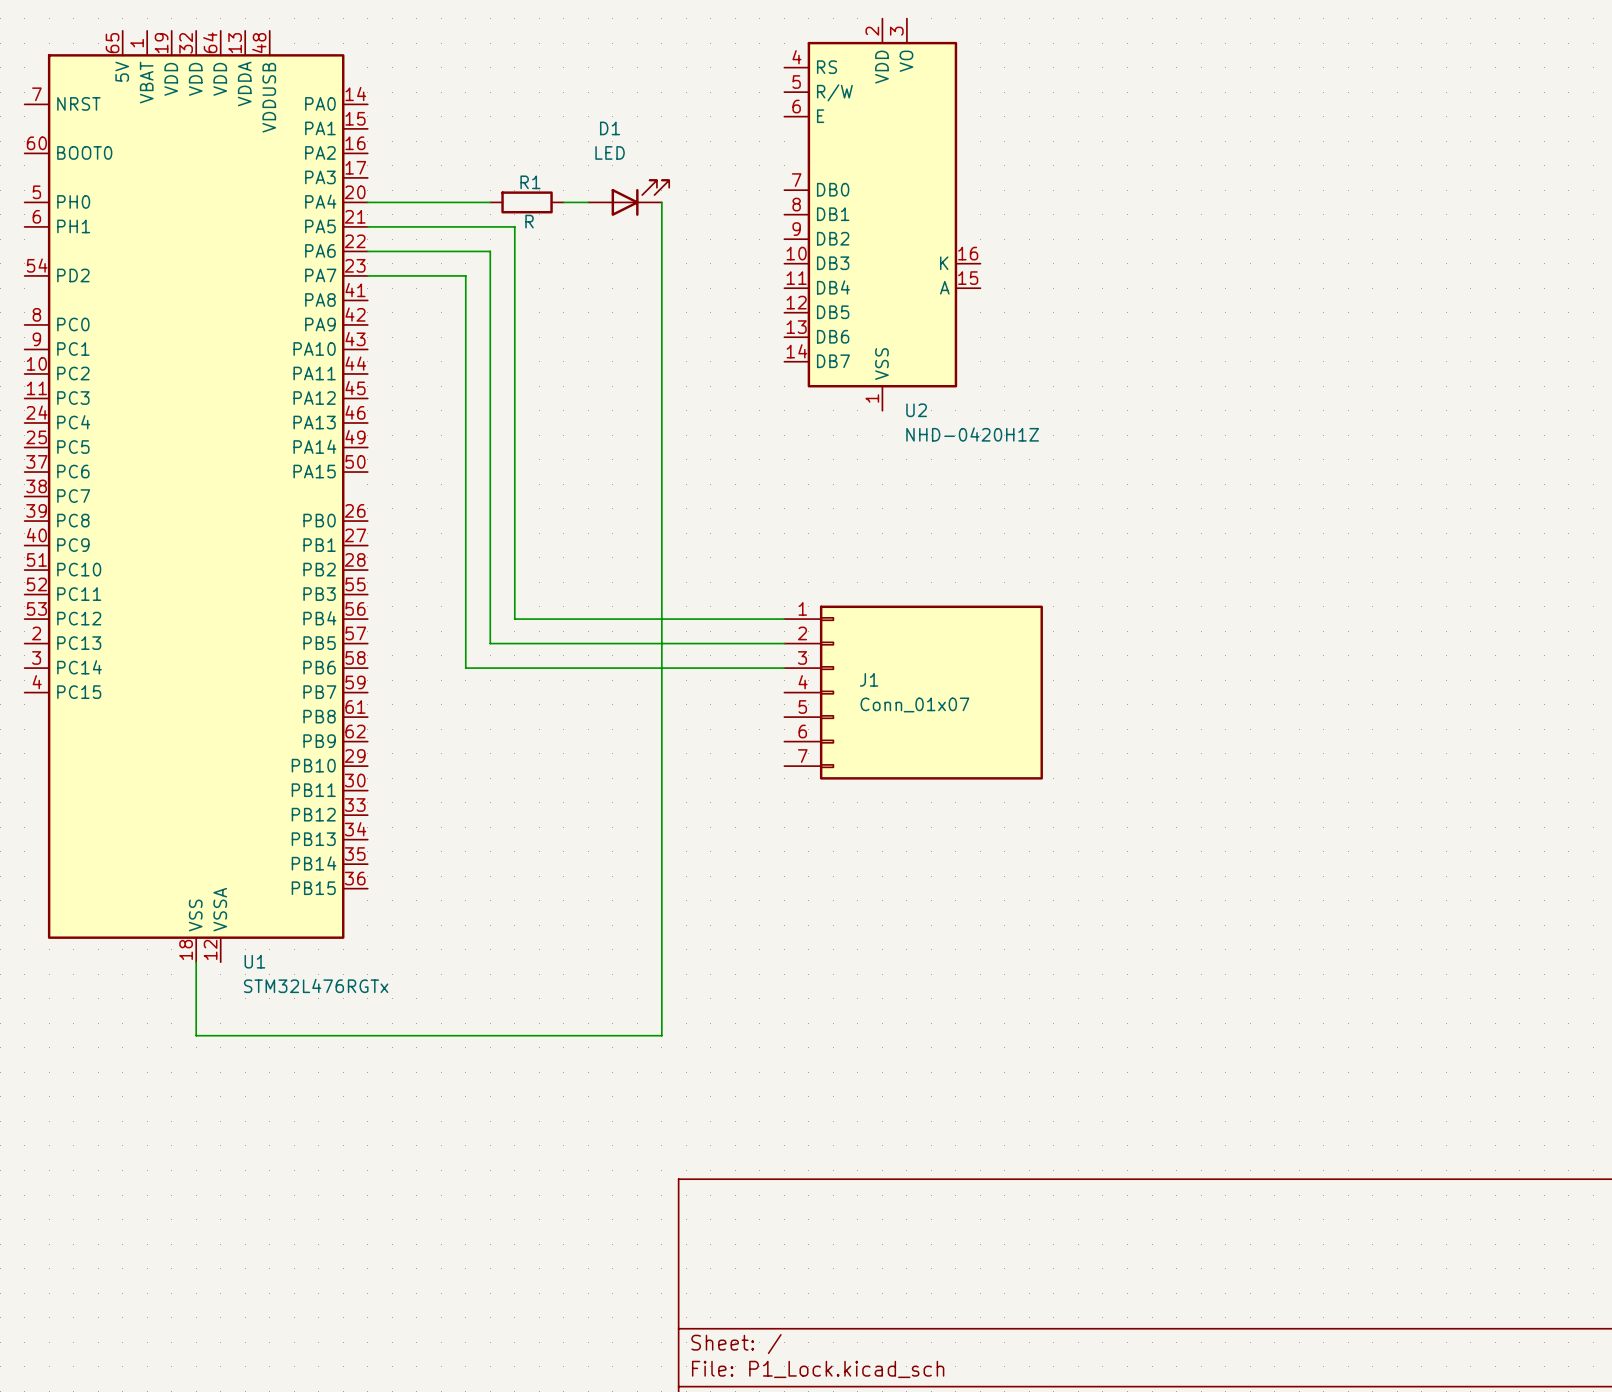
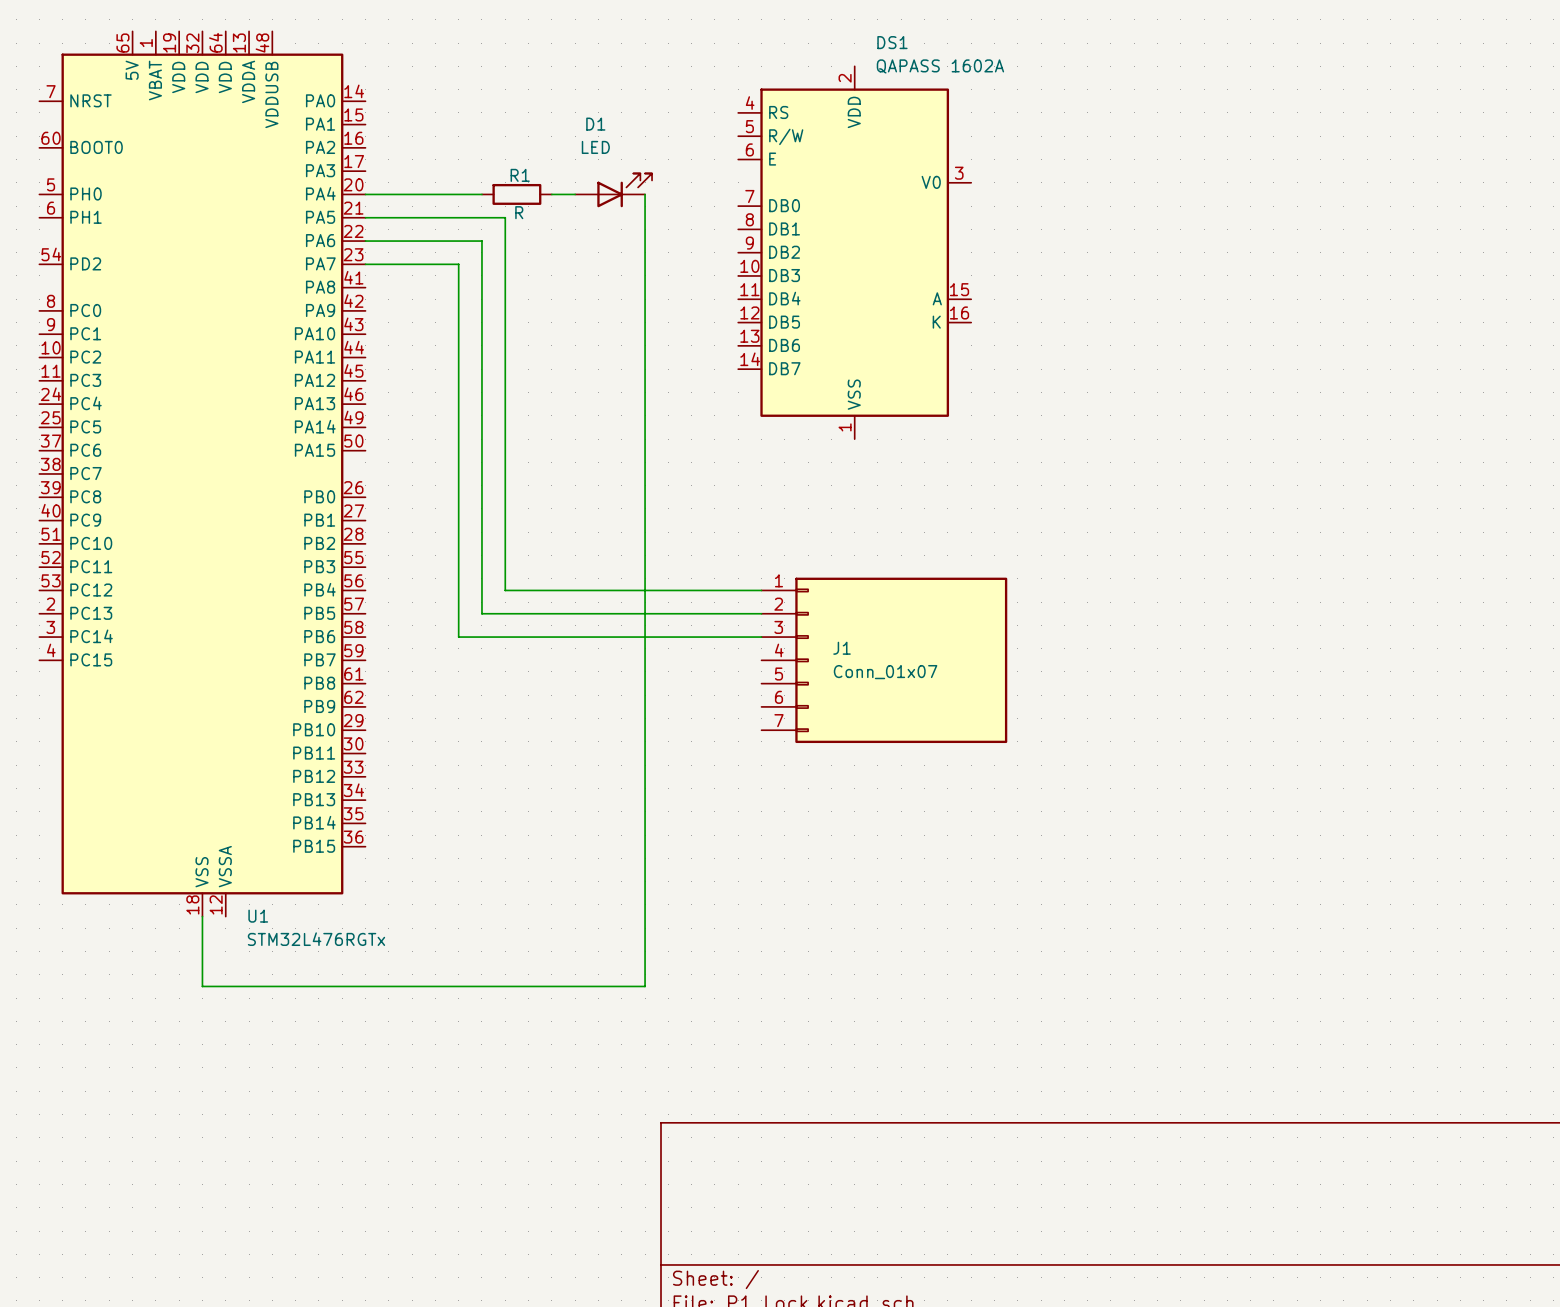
U2: NHD-0420H1Z (882, 214) -> none
DS1: none -> QAPASS 1602A (854, 252)

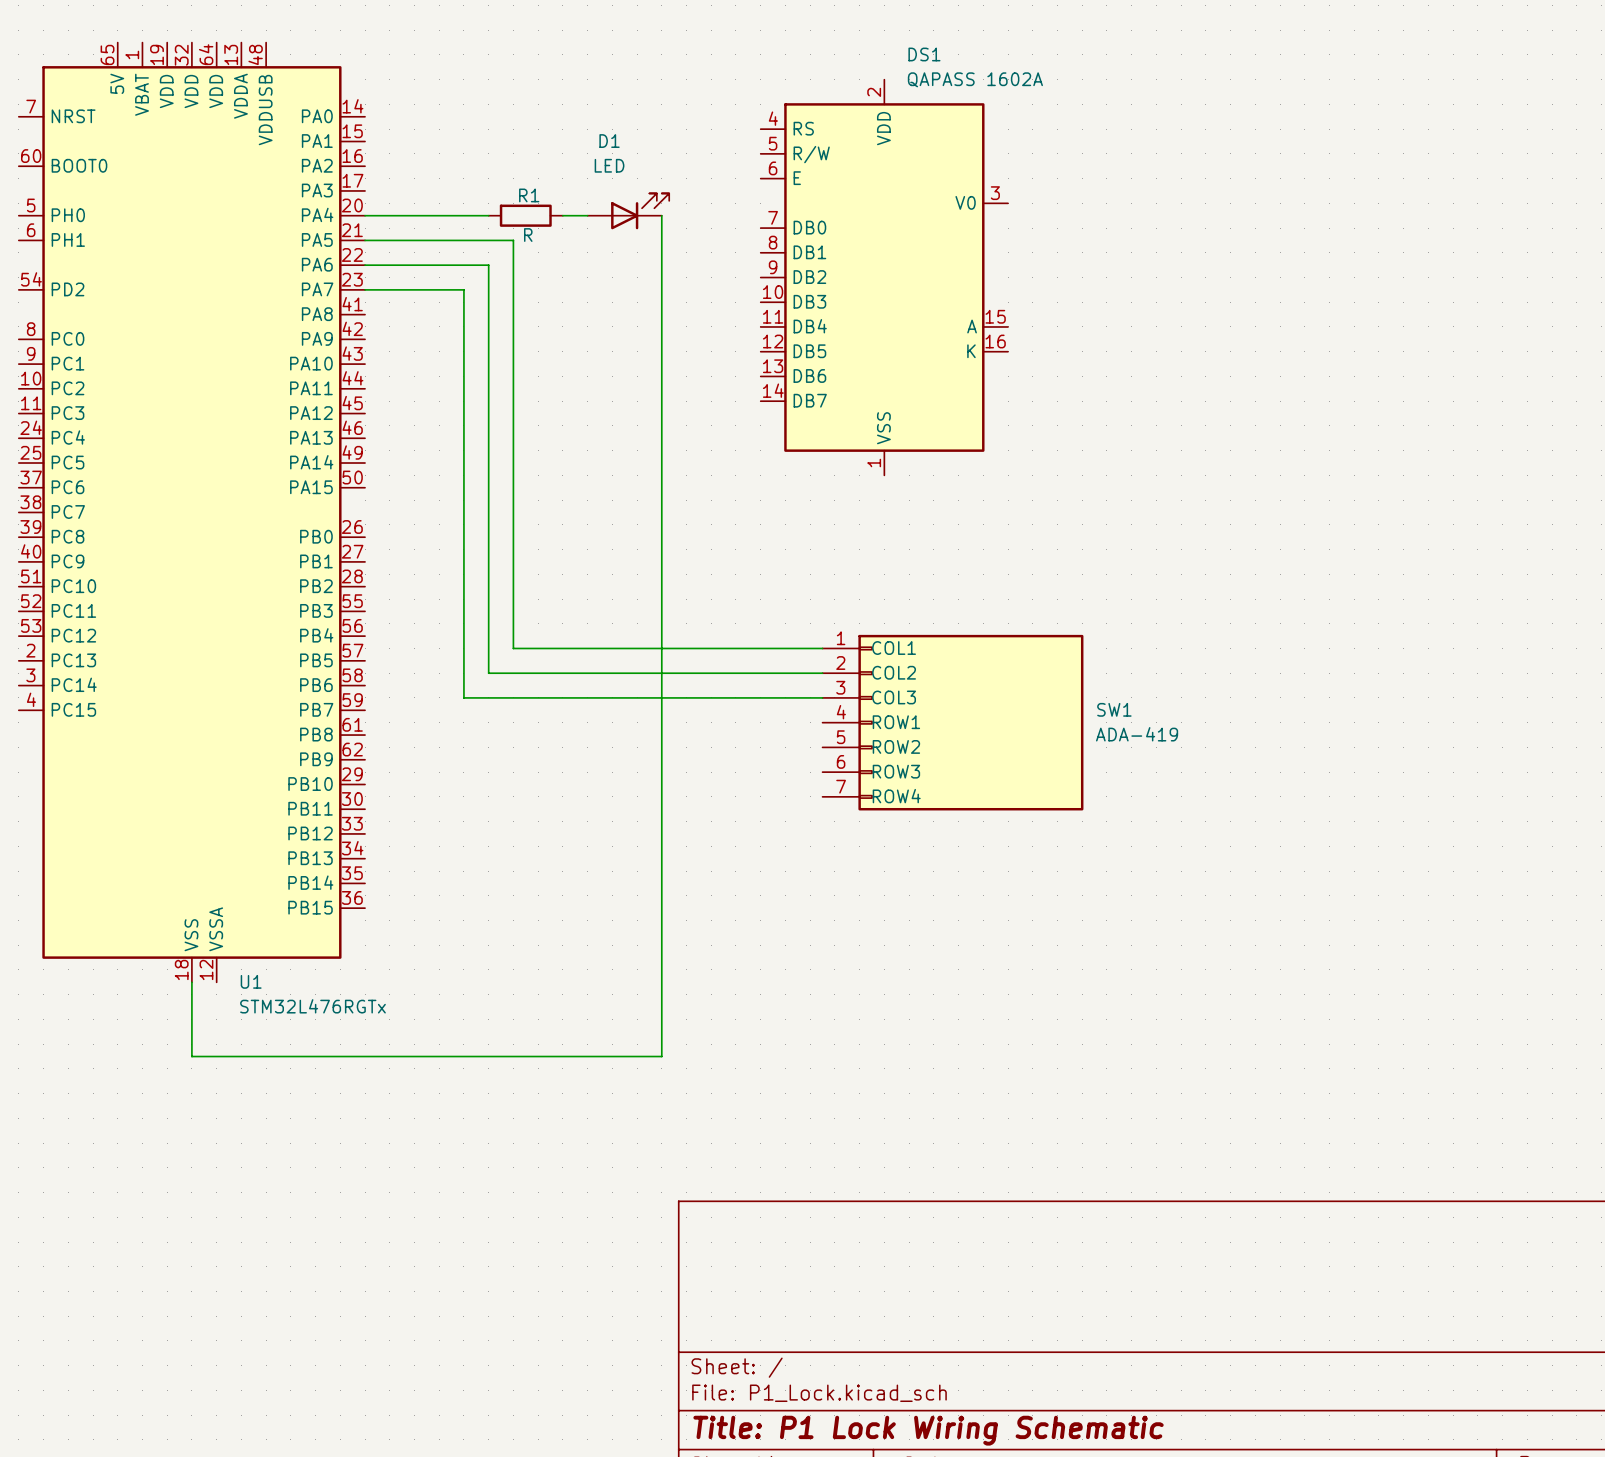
wire: (505, 590) (761, 590) -> (513, 636) (513, 648) (822, 648)
wire: (481, 613) (761, 613) -> (488, 660) (488, 673) (822, 673)
wire: (458, 637) (761, 637) -> (463, 685) (463, 697) (822, 697)
J1: Conn_01x07 (884, 660) -> none
SW1: none -> ADA-419 (952, 722)

